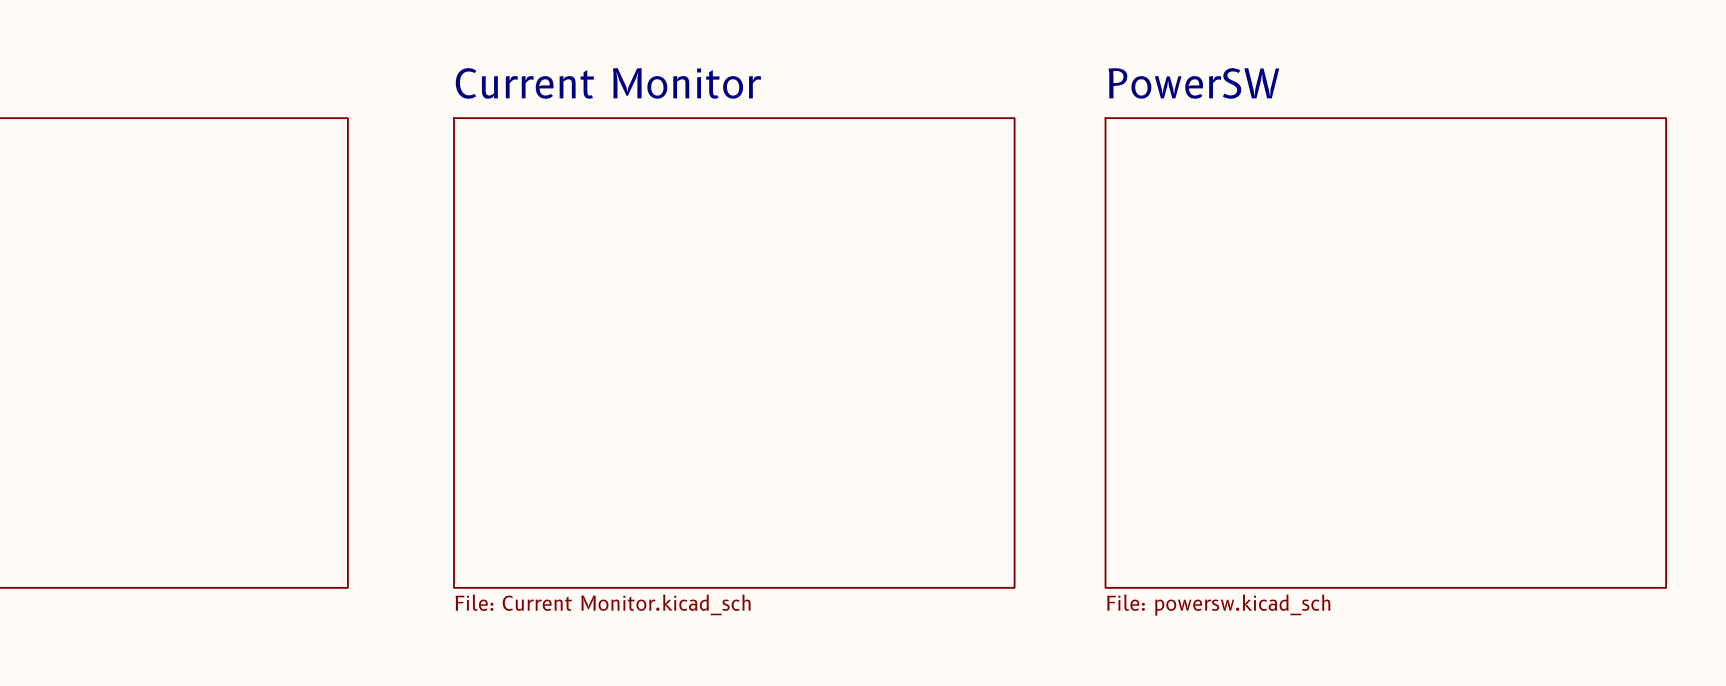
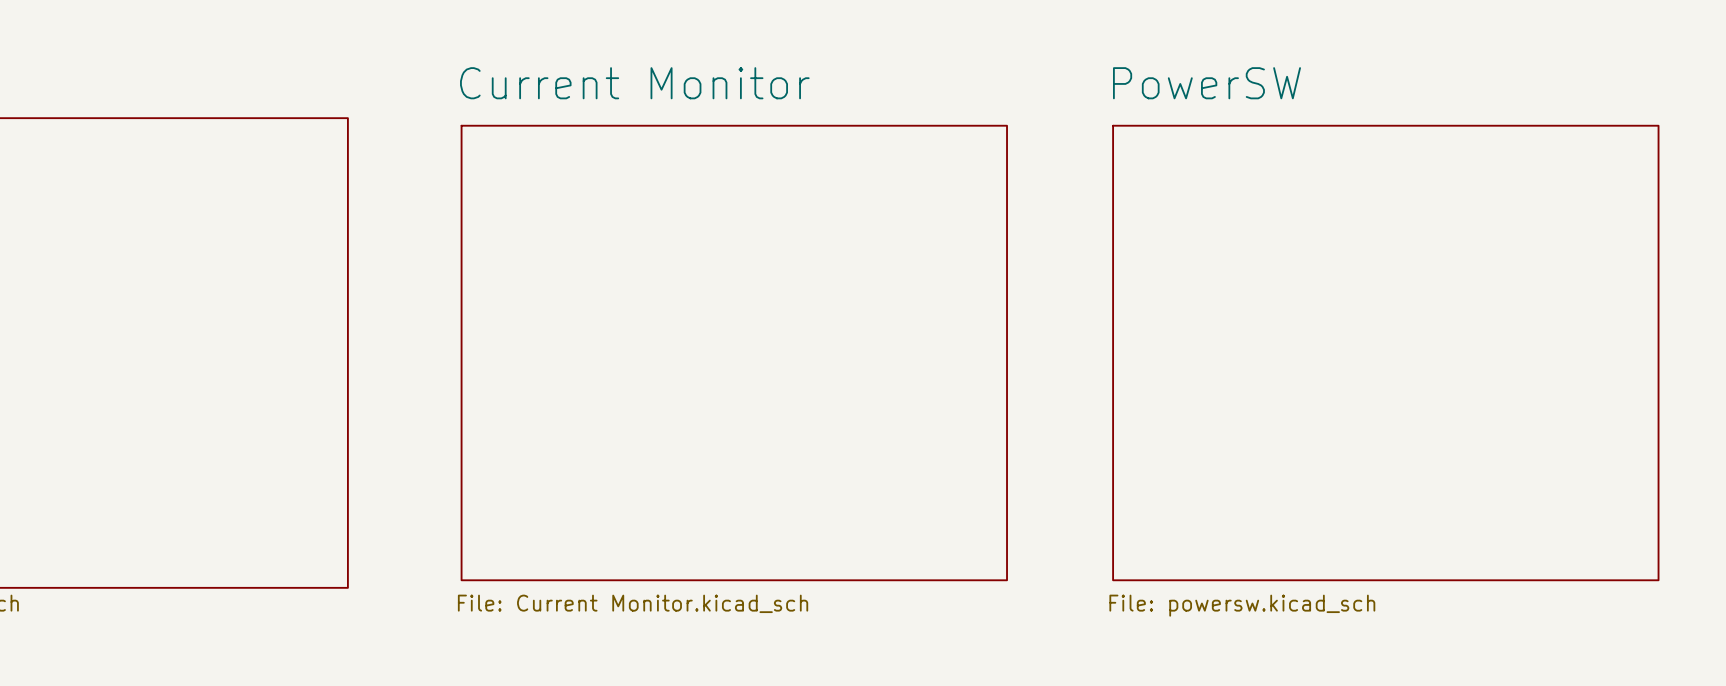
sheet Current Monitor shape: [453, 117, 1016, 589] -> [460, 124, 1008, 582]
sheet PowerSW shape: [1104, 117, 1668, 589] -> [1112, 124, 1660, 582]

